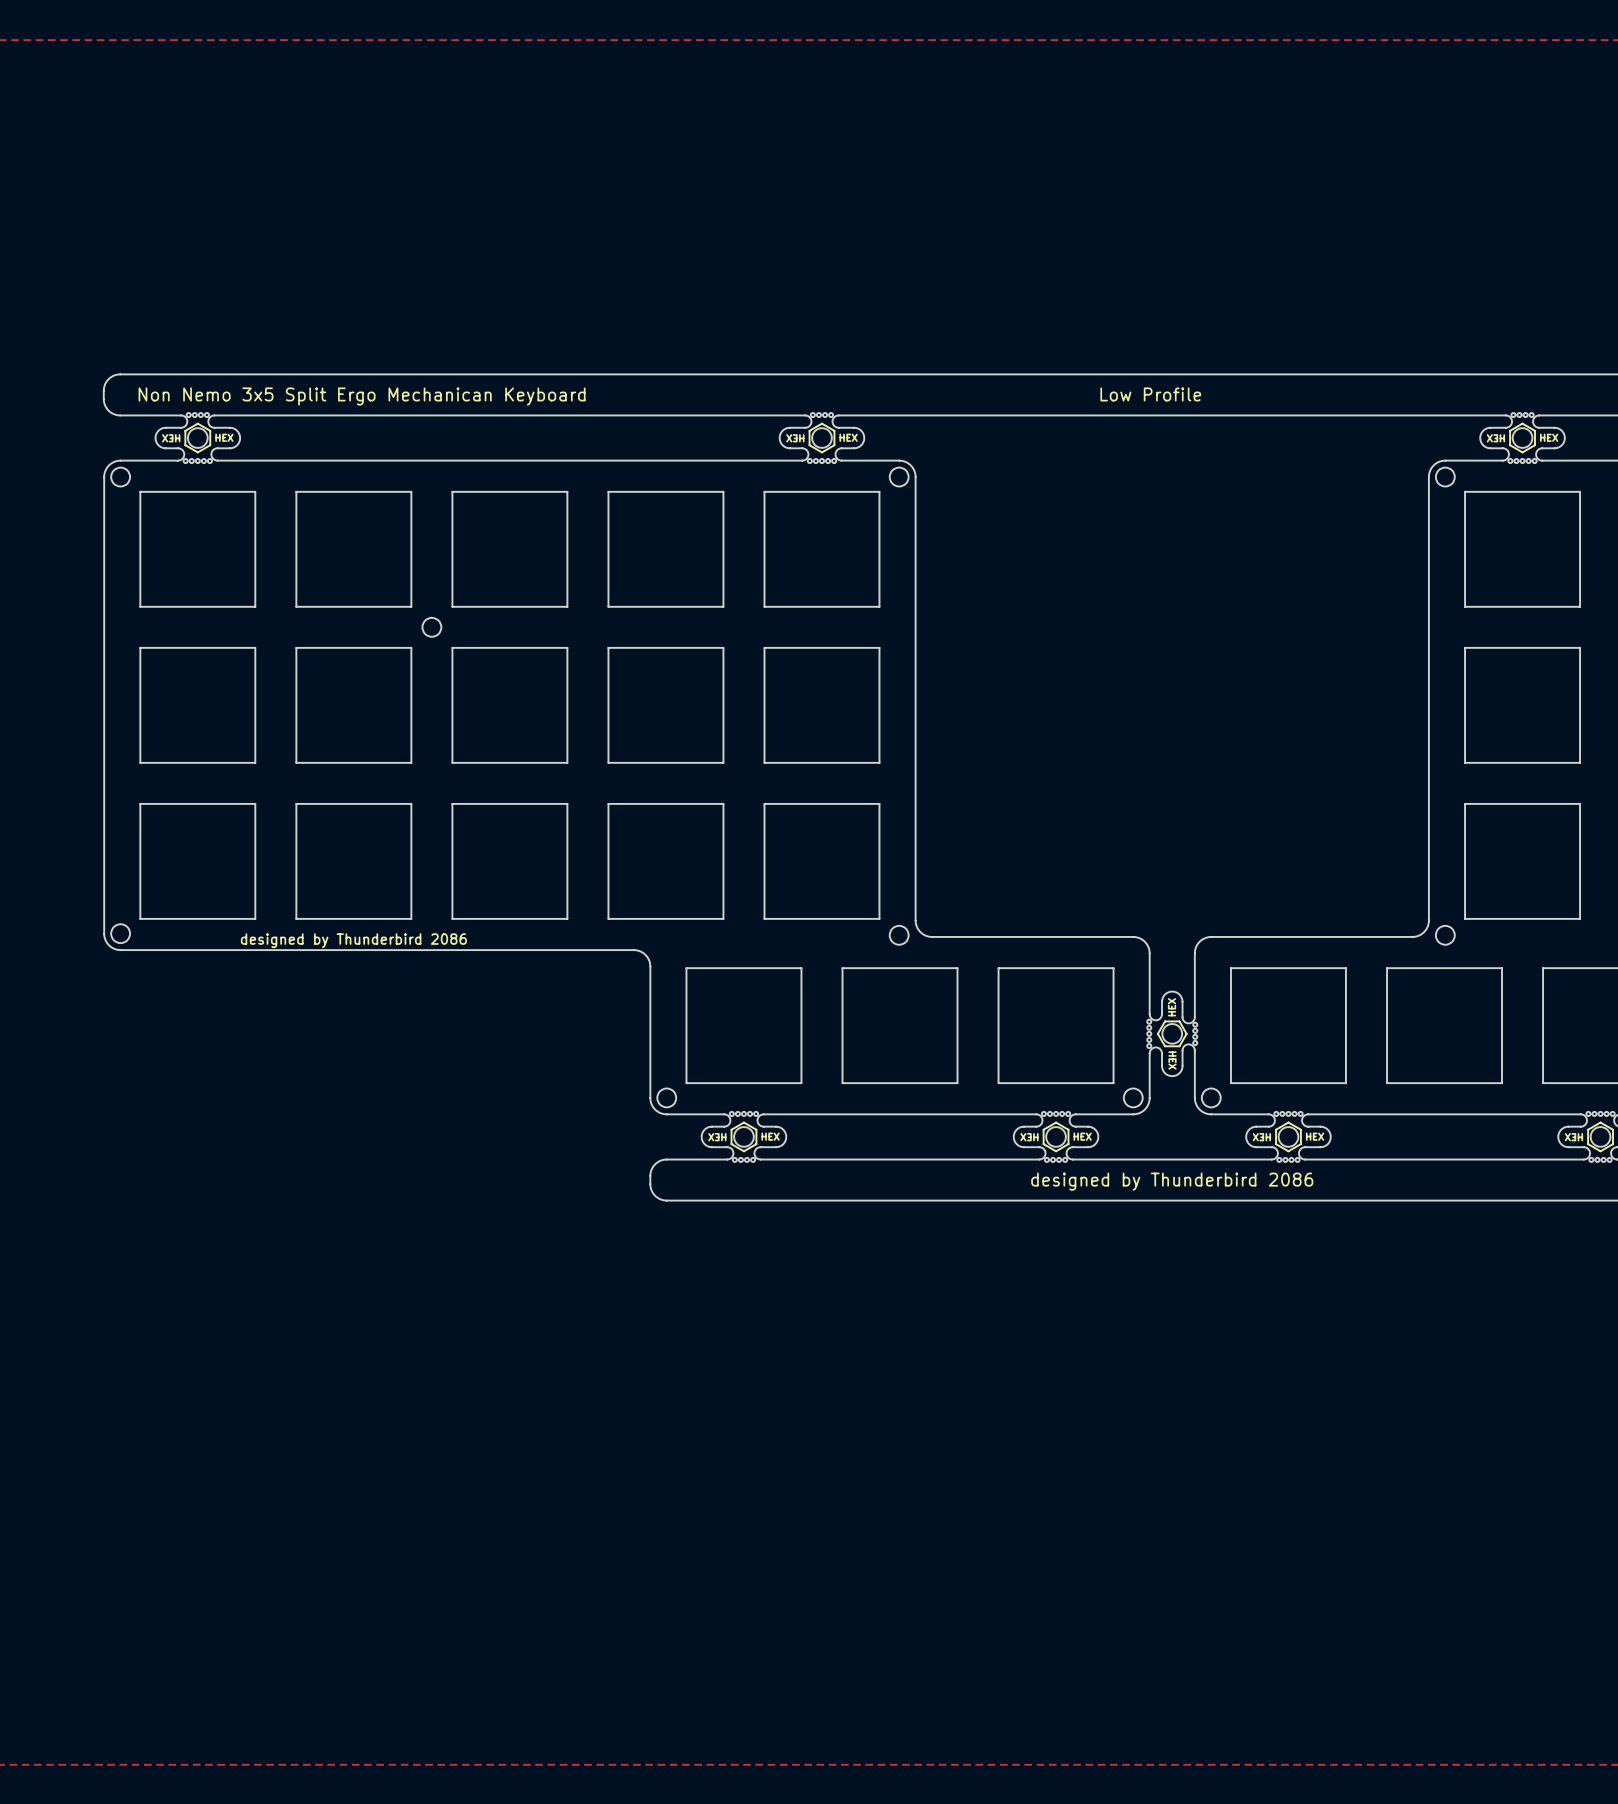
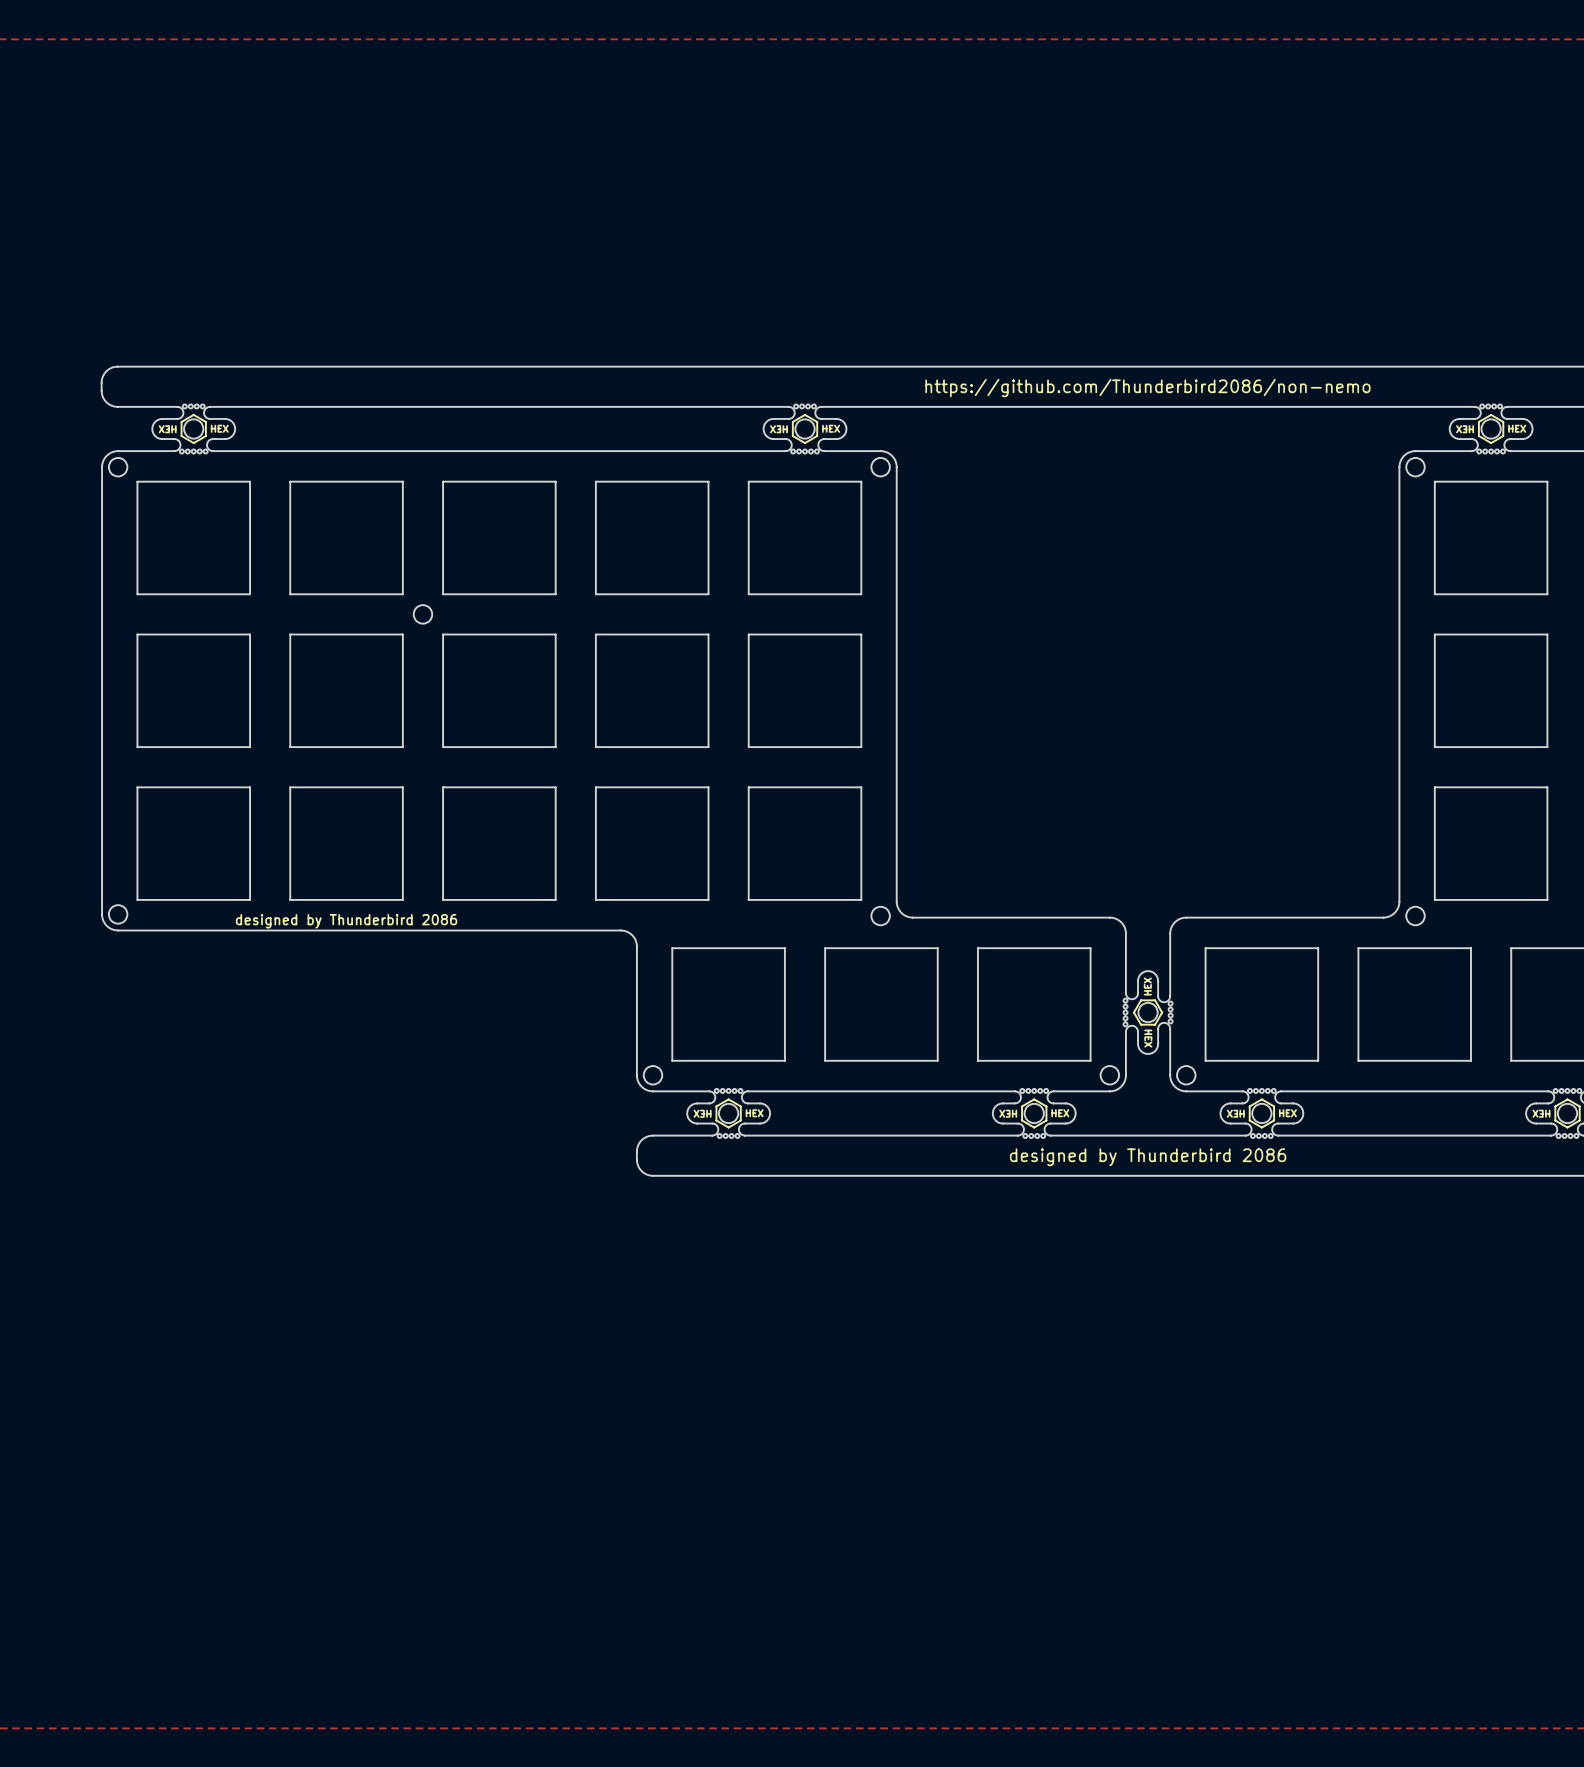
text: Low Profile (1150, 394) -> none
text: Non Nemo 3x5 Split Ergo Mechanican Keyboard (362, 396) -> none
text: none -> https://github.com/Thunderbird2086/non-nemo (1147, 388)

